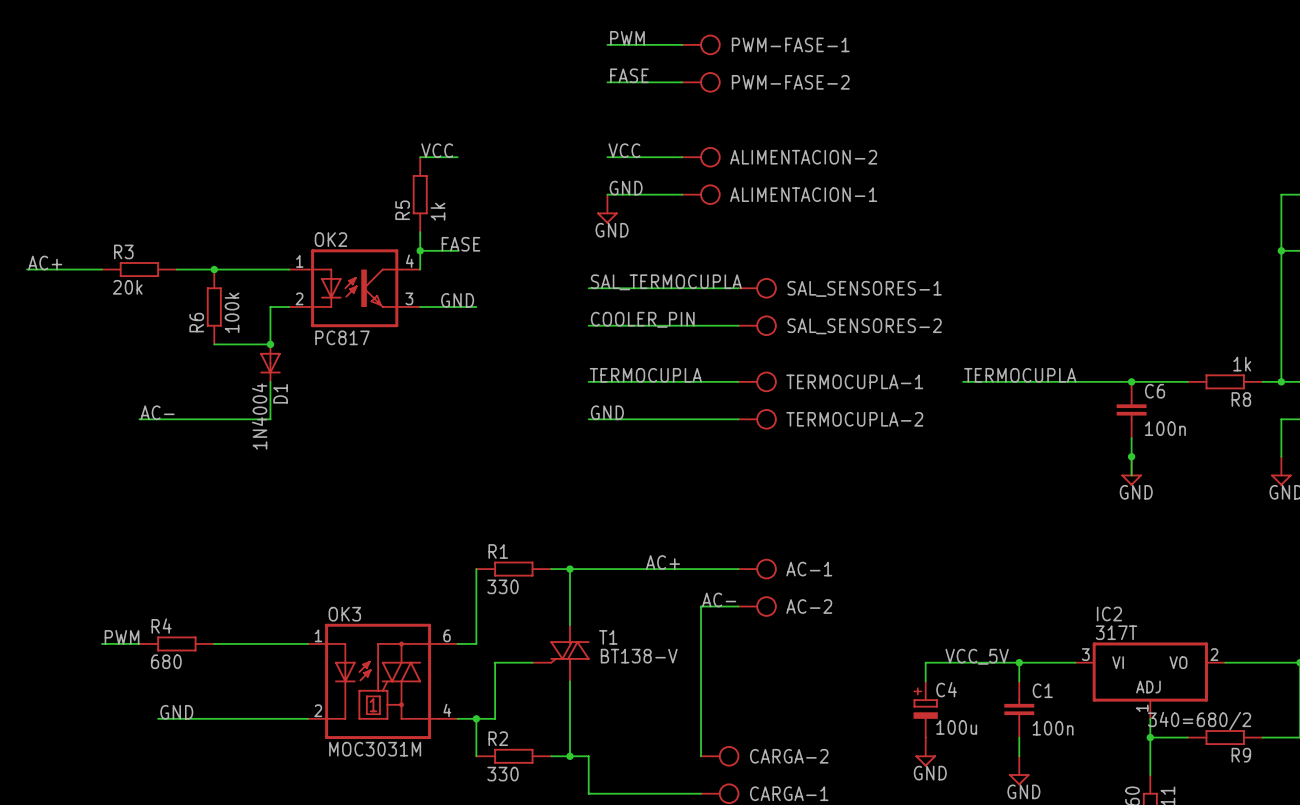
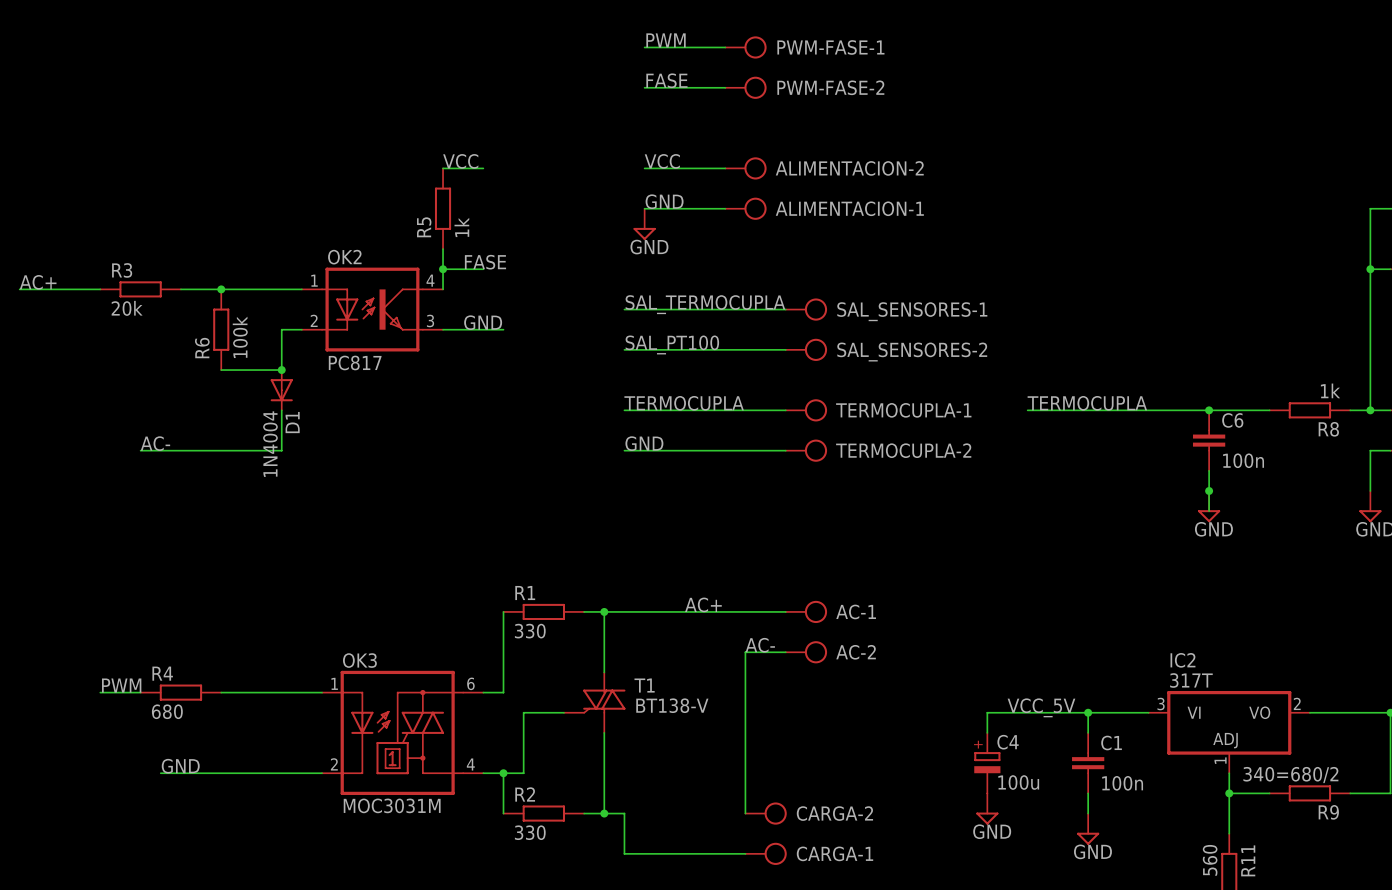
label: COOLER_PIN (642, 319) -> SAL_PT100 (672, 344)

